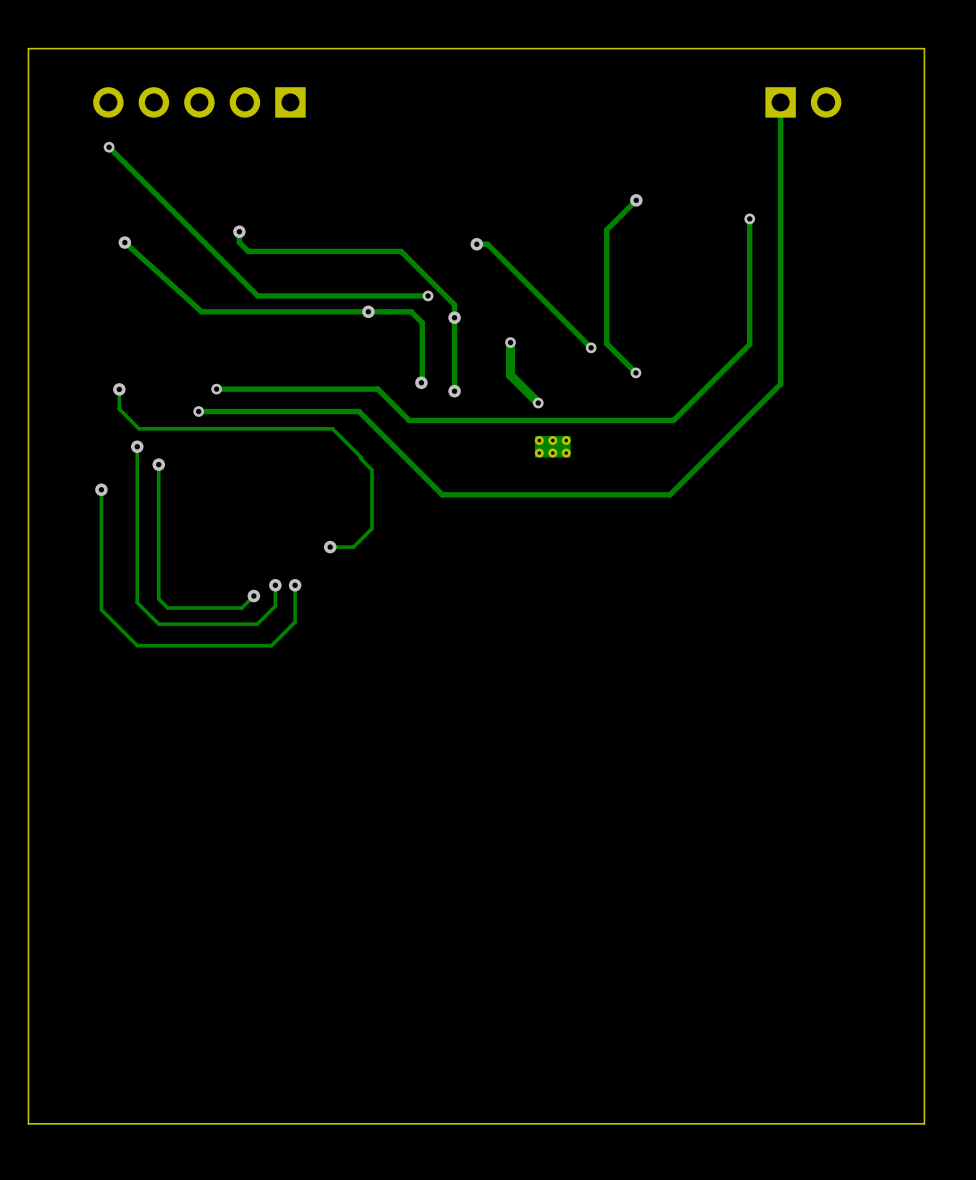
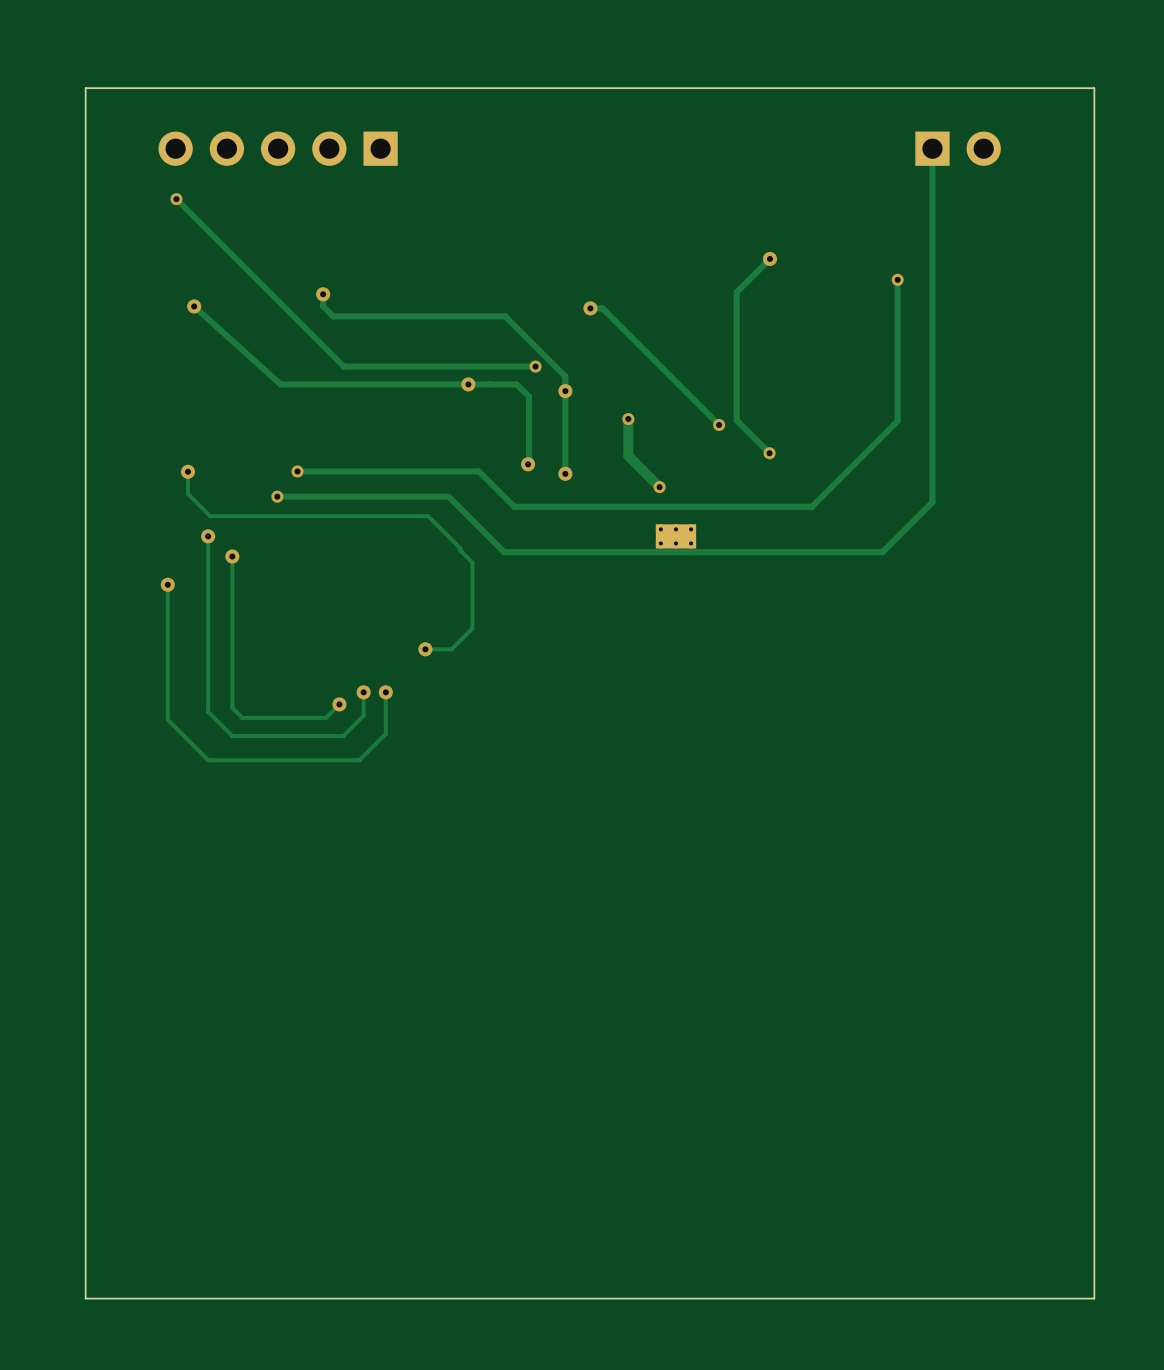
track: (780, 384) (669, 494) (442, 494) (359, 411) (351, 411) -> (932, 465) (932, 502) (882, 552) (504, 552) (448, 496)

